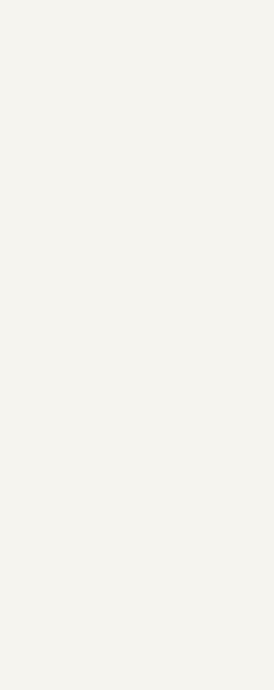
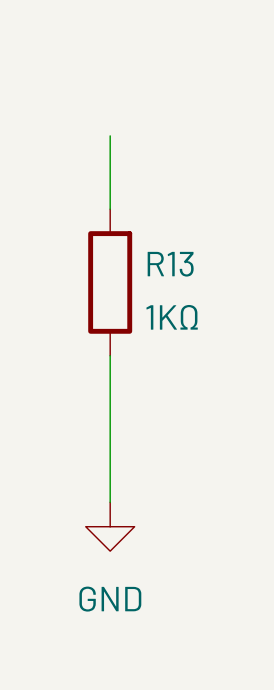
wire: none -> (110, 135) (110, 209)
R13: none -> 1KΩ (110, 282)
wire: none -> (110, 355) (110, 502)
power symbol: none -> GND (110, 526)

